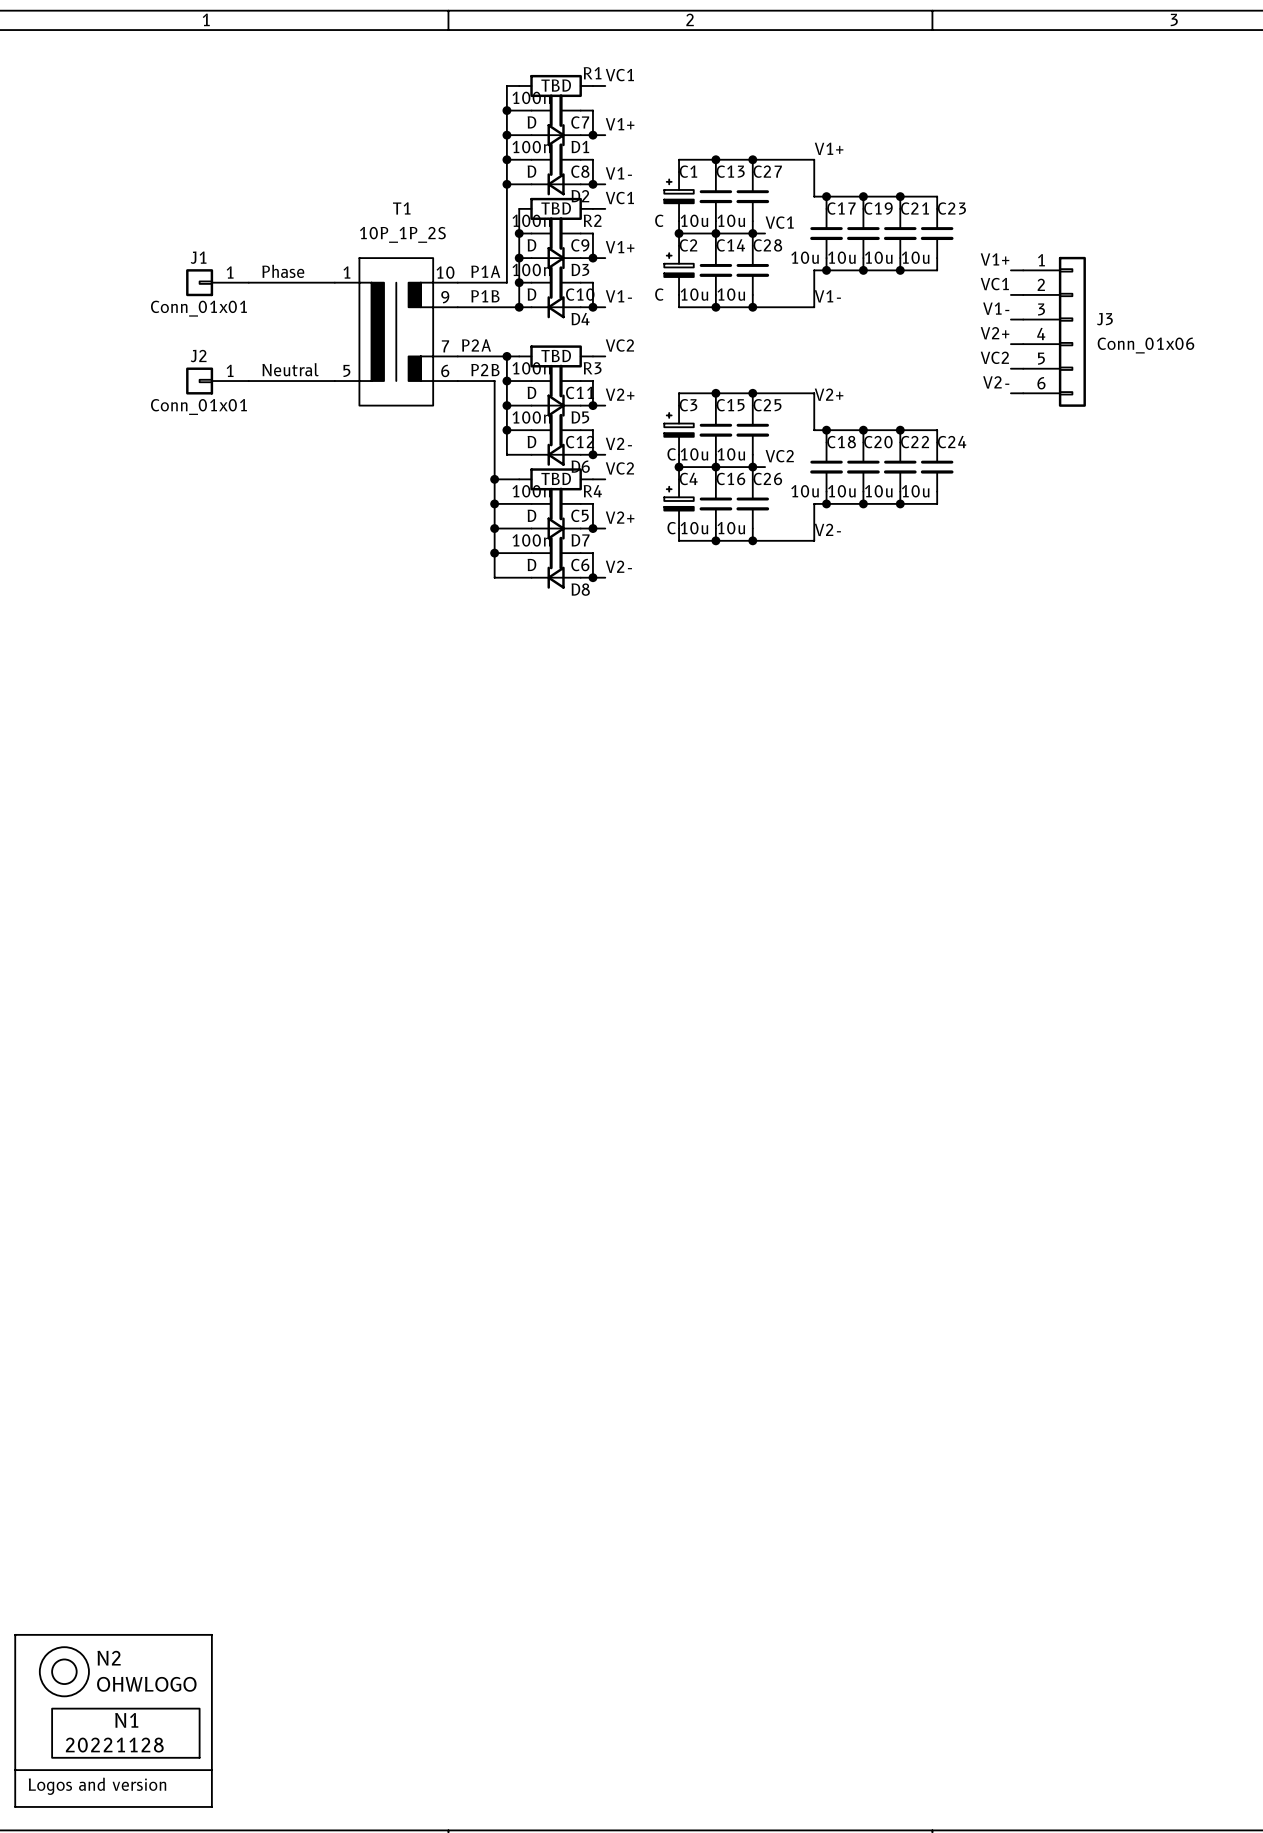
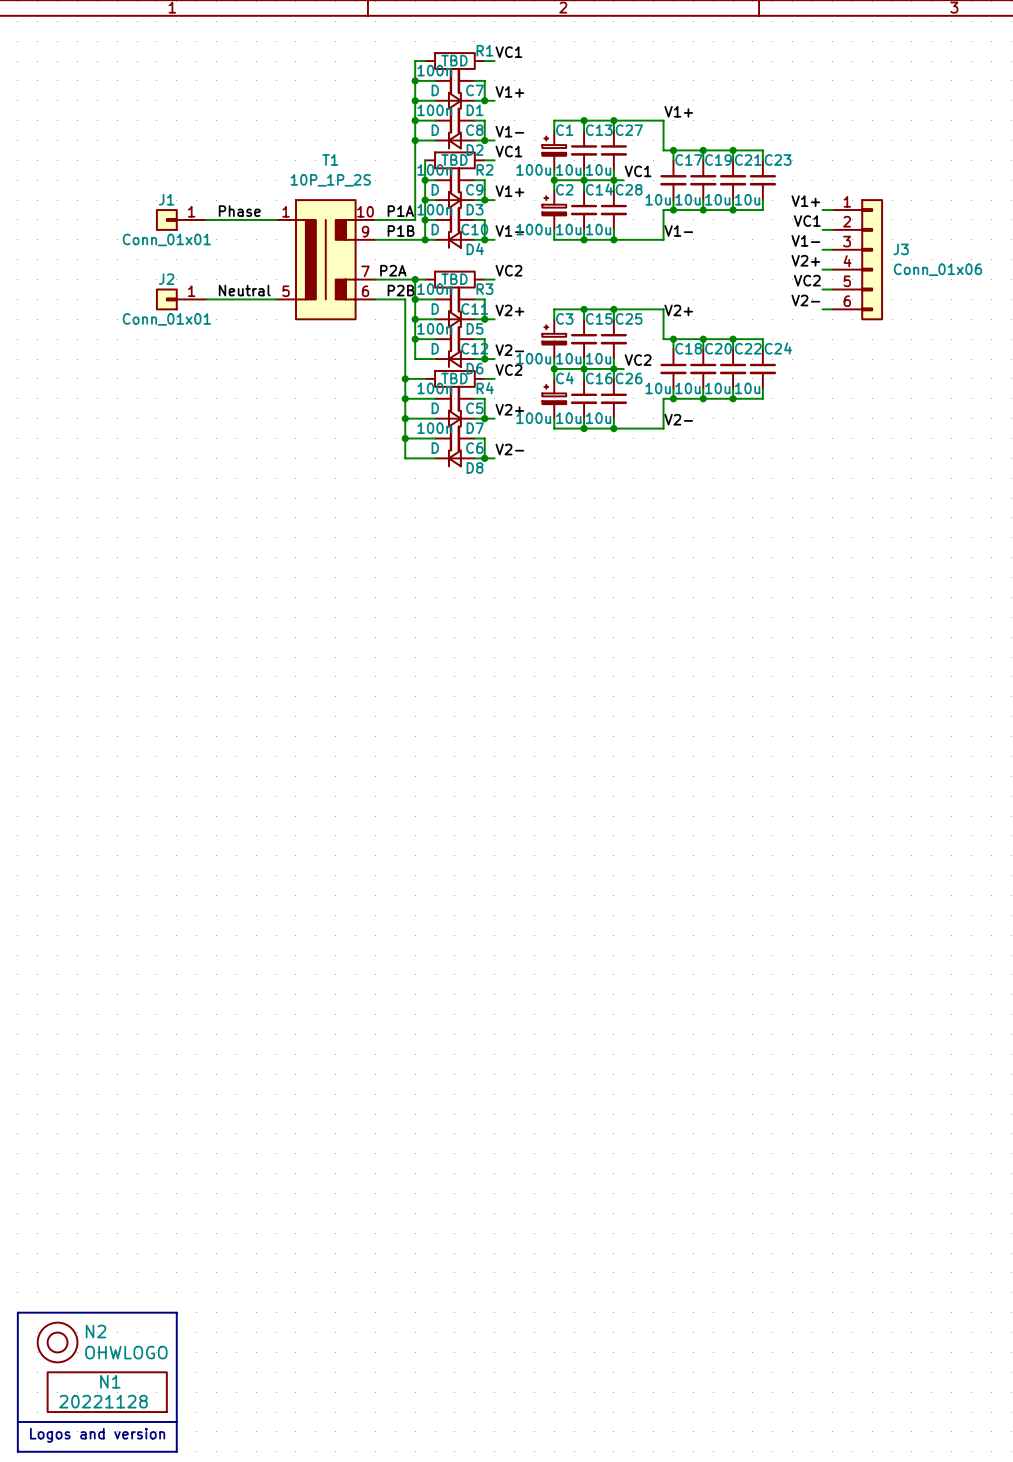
C1 value: C (659, 220) -> 100u (533, 169)
C2 value: C (659, 294) -> 100u (533, 229)
C3 value: C (671, 454) -> 100u (533, 358)
C4 value: C (671, 528) -> 100u (533, 418)

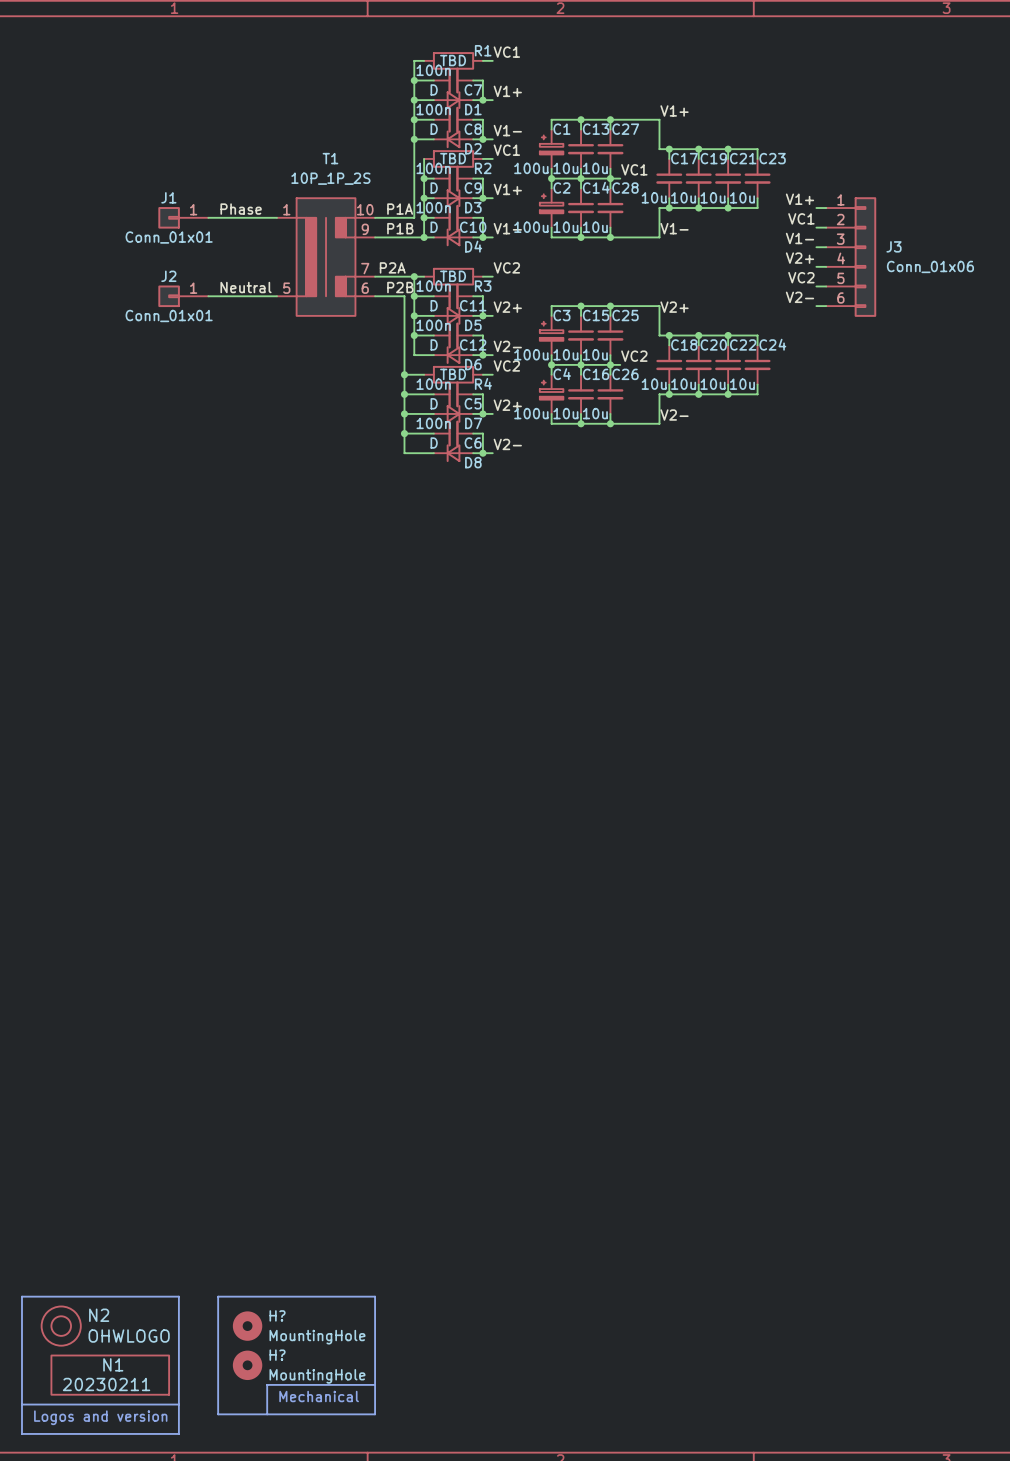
line: none -> (218, 1296) (218, 1414) (375, 1414) (375, 1296) (218, 1296)
H?: none -> MountingHole (247, 1326)
H?: none -> MountingHole (247, 1365)
N1 value: 20221128 (103, 1401) -> 20230211 (106, 1384)
line: none -> (375, 1384) (267, 1384) (267, 1414)
text: none -> Mechanical (319, 1396)

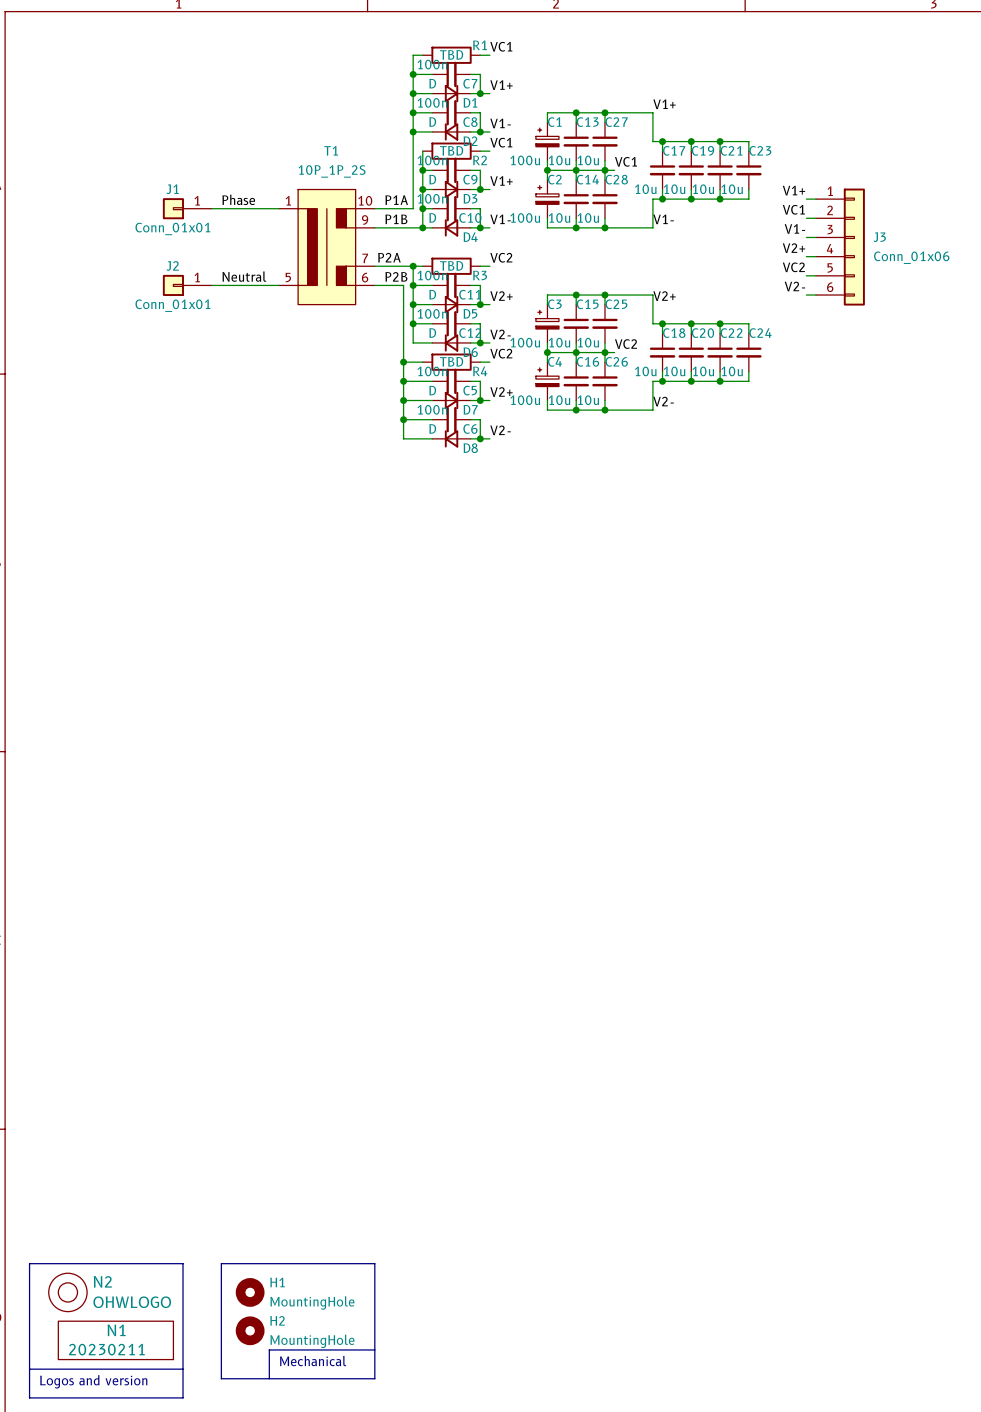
H? name: H? (277, 1315) -> H1 (277, 1282)
H? name: H? (277, 1355) -> H2 (277, 1320)

